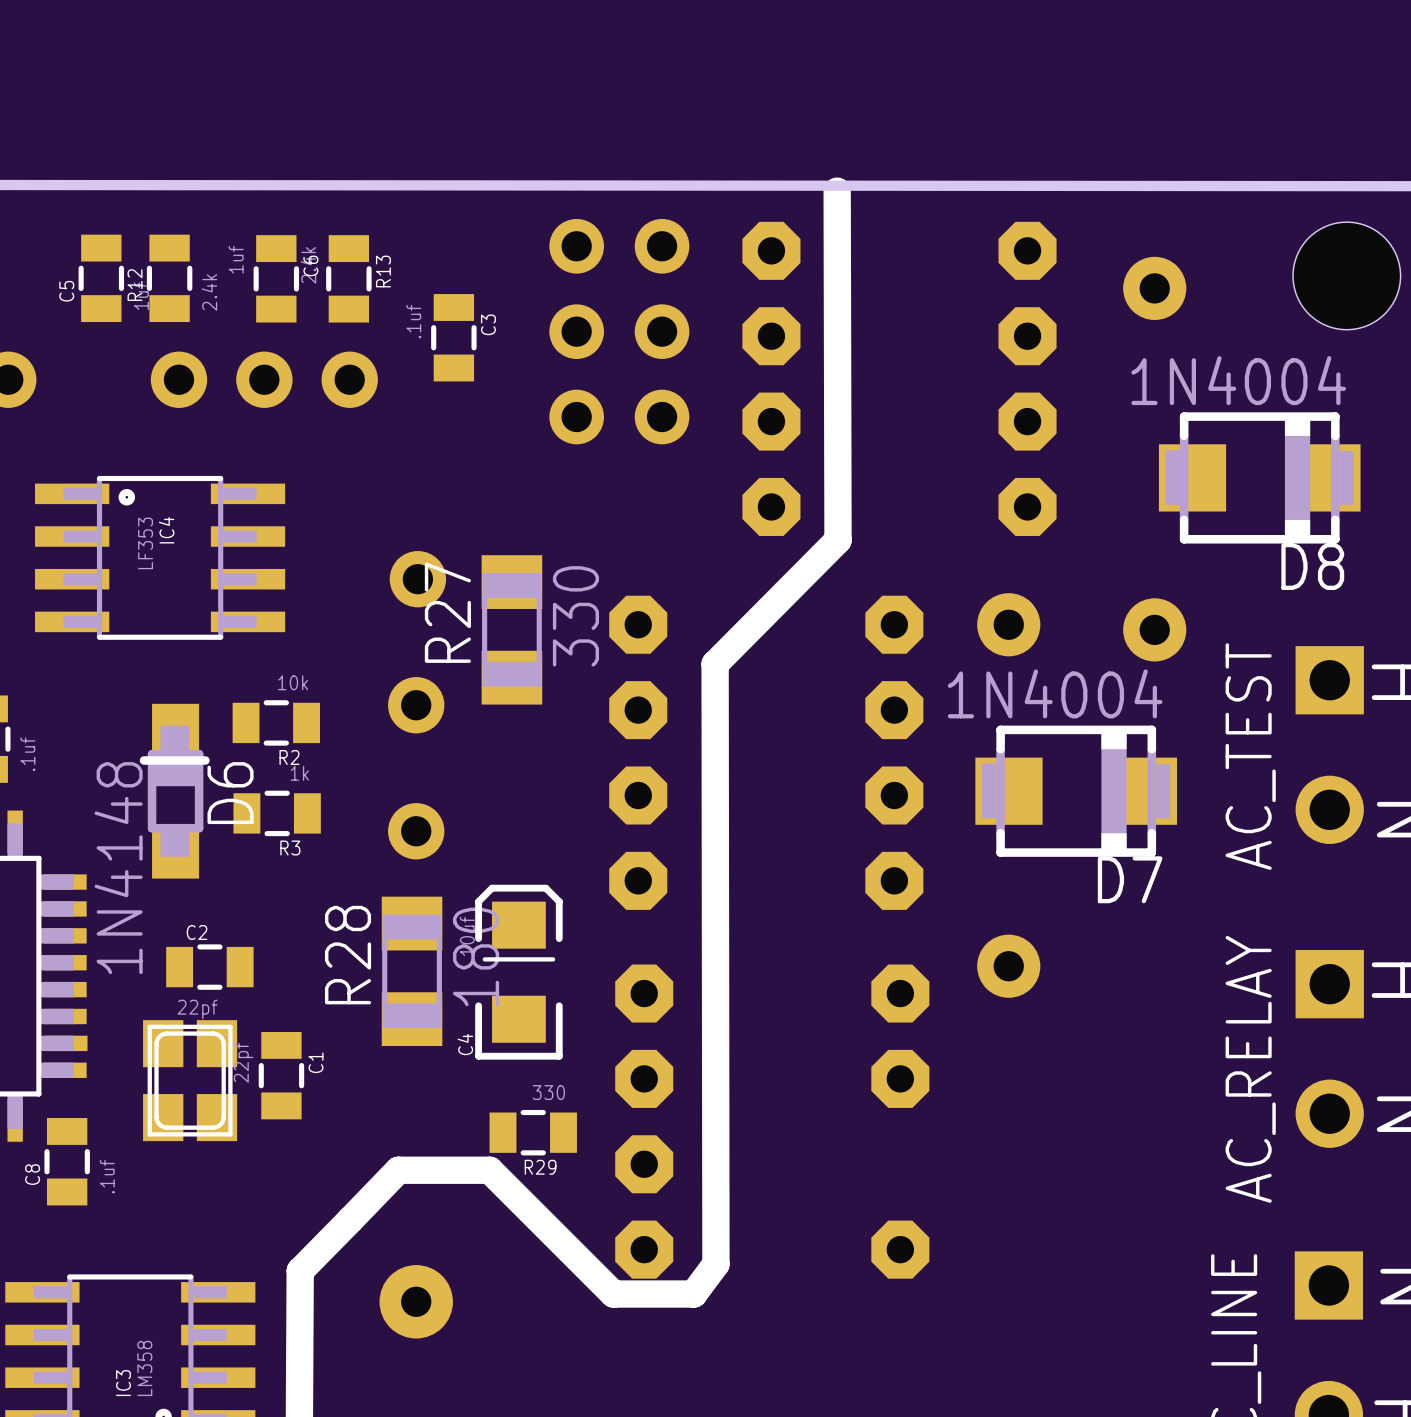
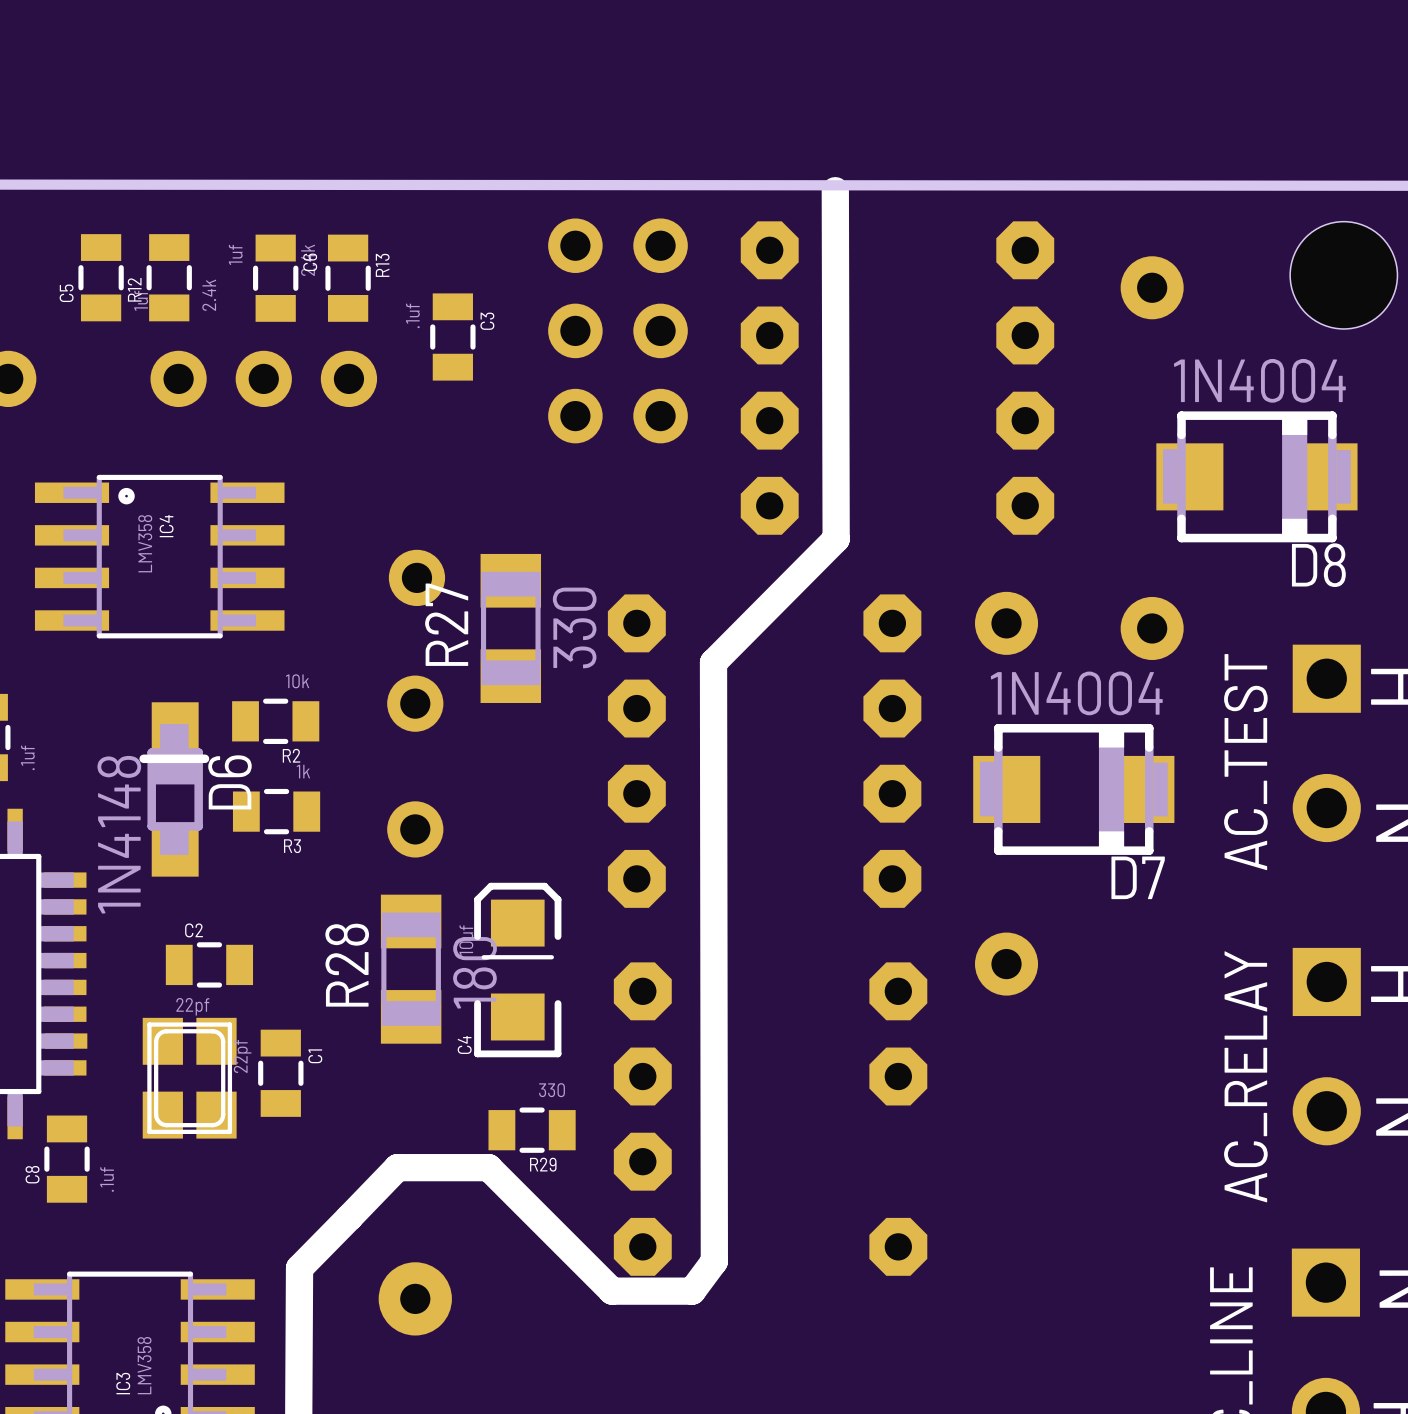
IC4 value: LF353 (145, 543) -> LMV358 (145, 543)
IC3 value: LM358 (144, 1368) -> LMV358 (144, 1365)

